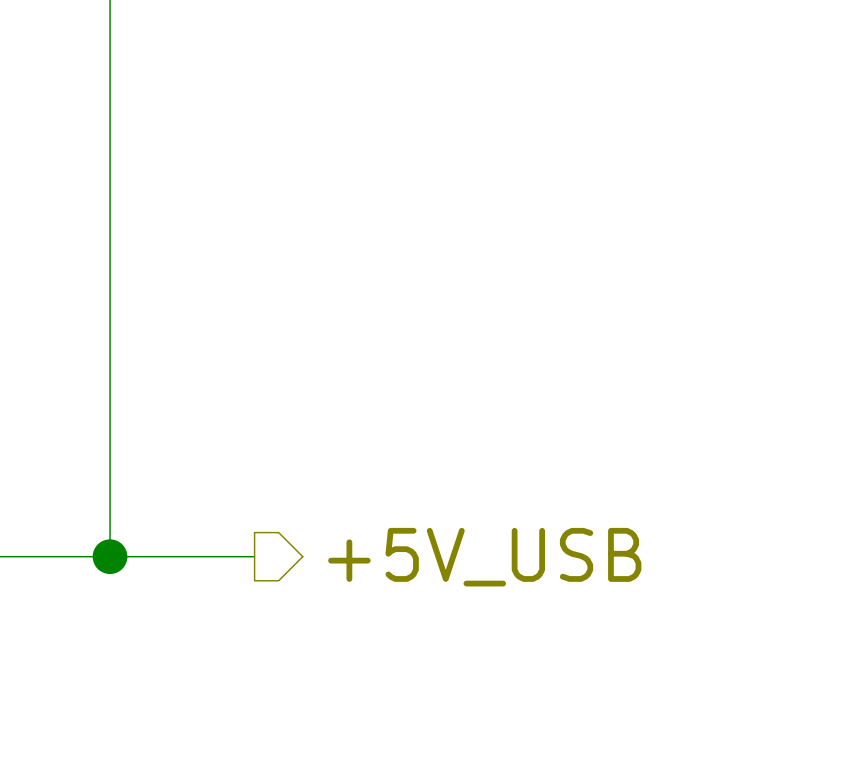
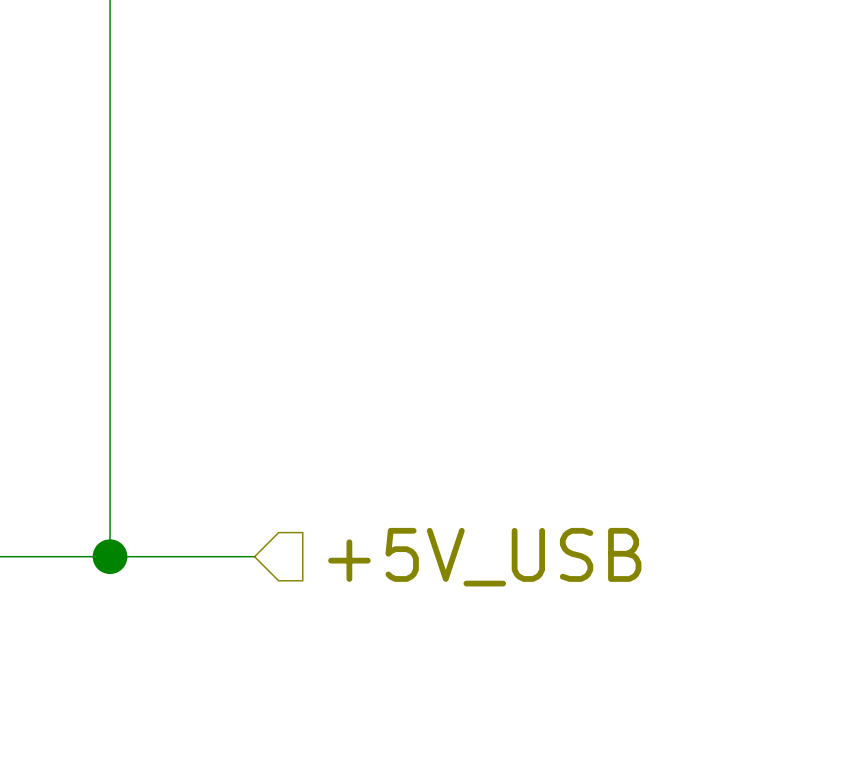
hierarchical label shape: output (484, 557) -> input (484, 557)

